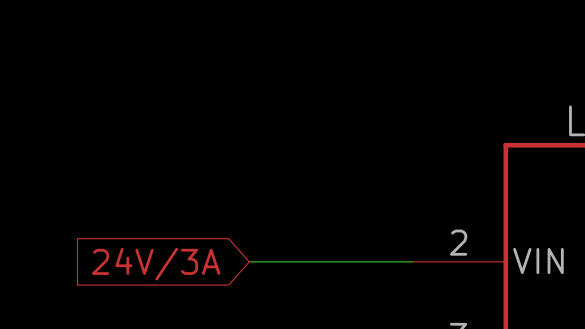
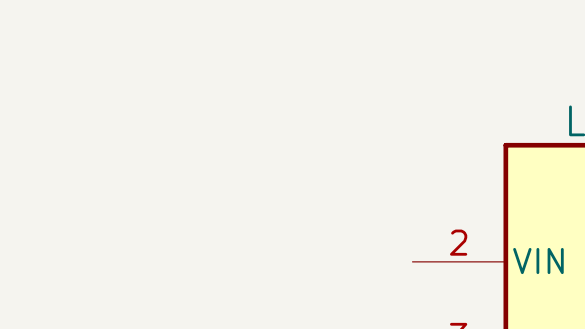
wire: (249, 261) (412, 261) -> none
global label: 24V/3A (156, 264) -> none

